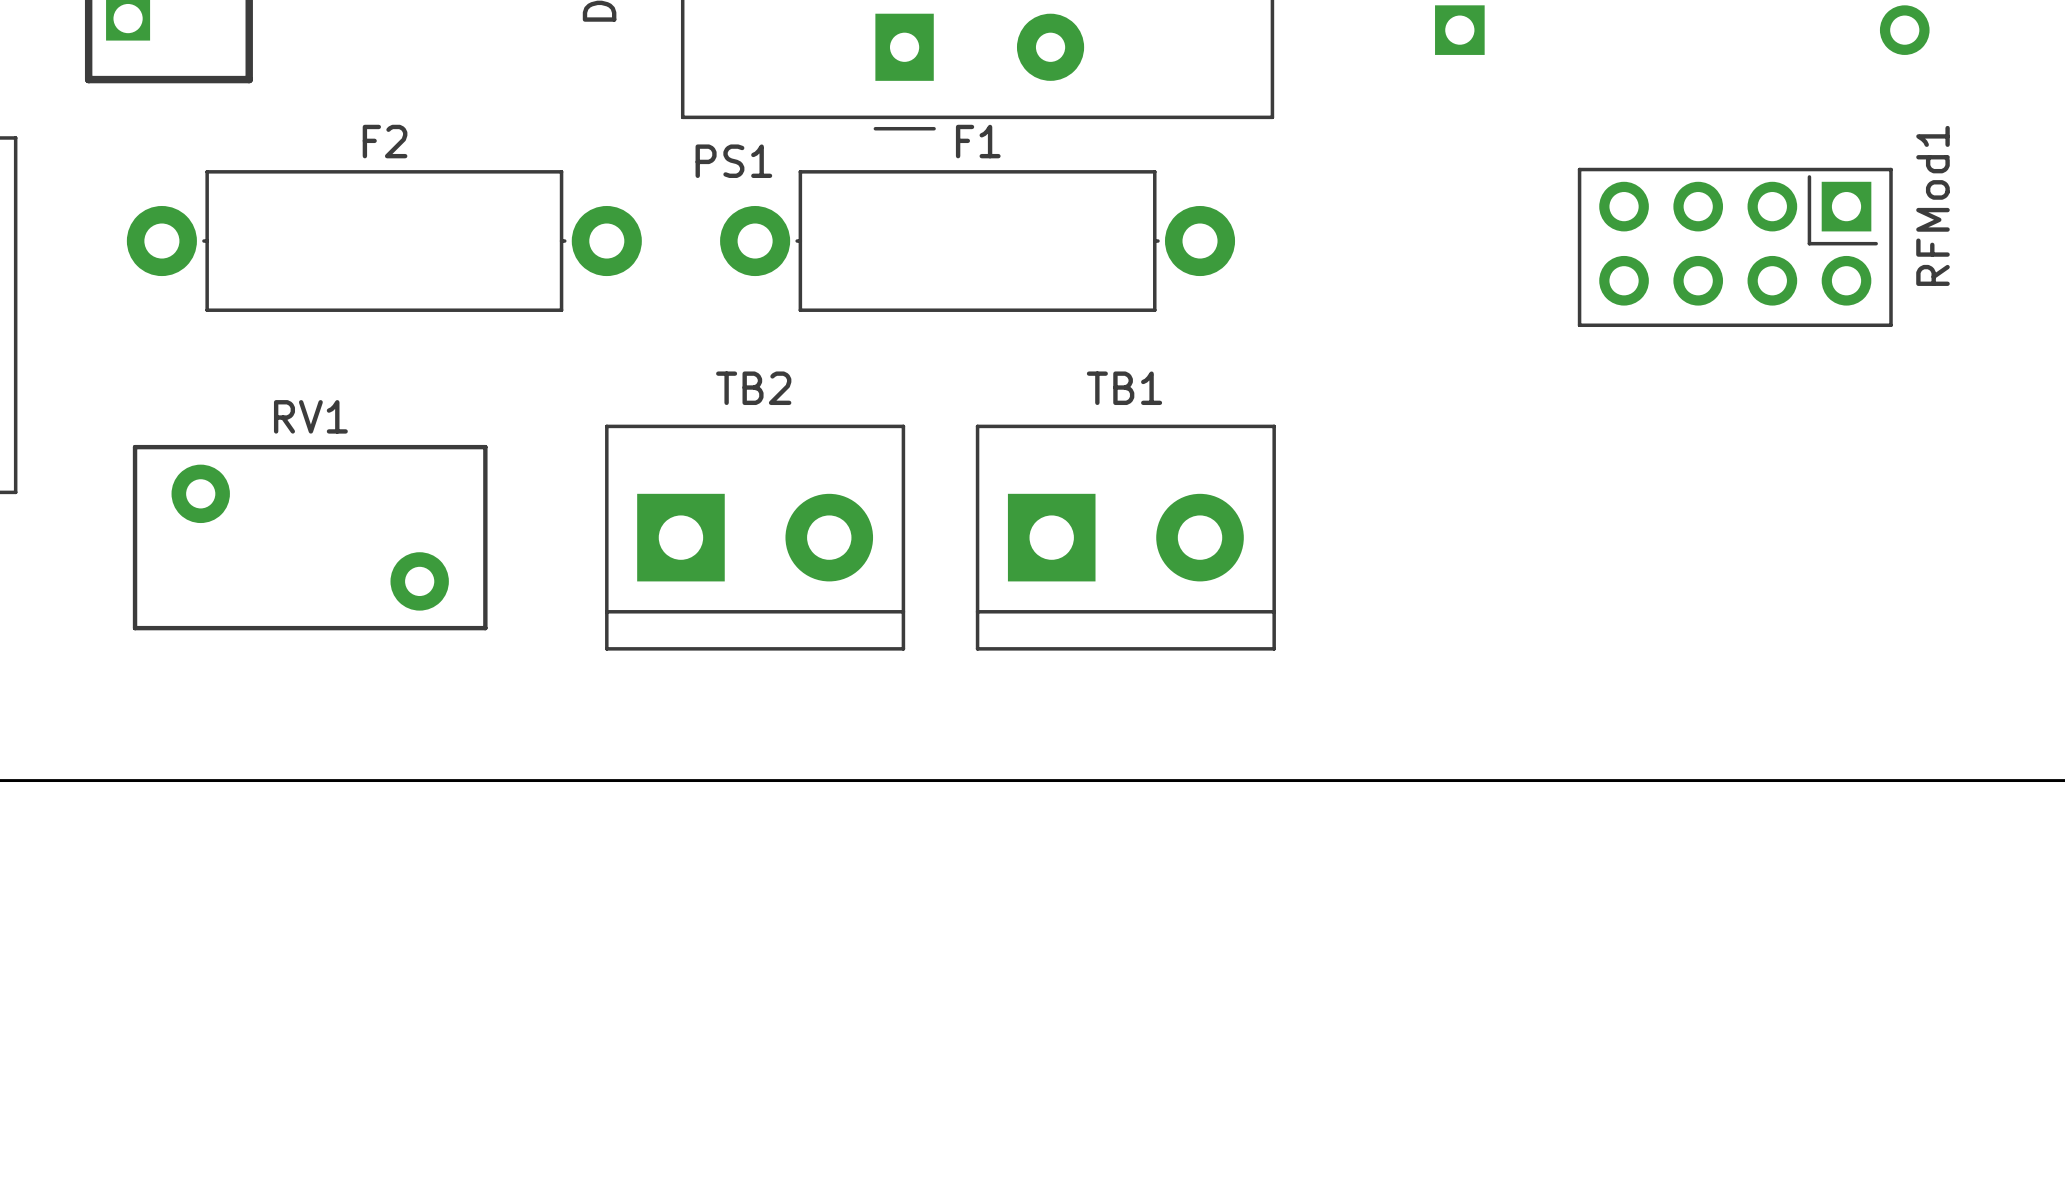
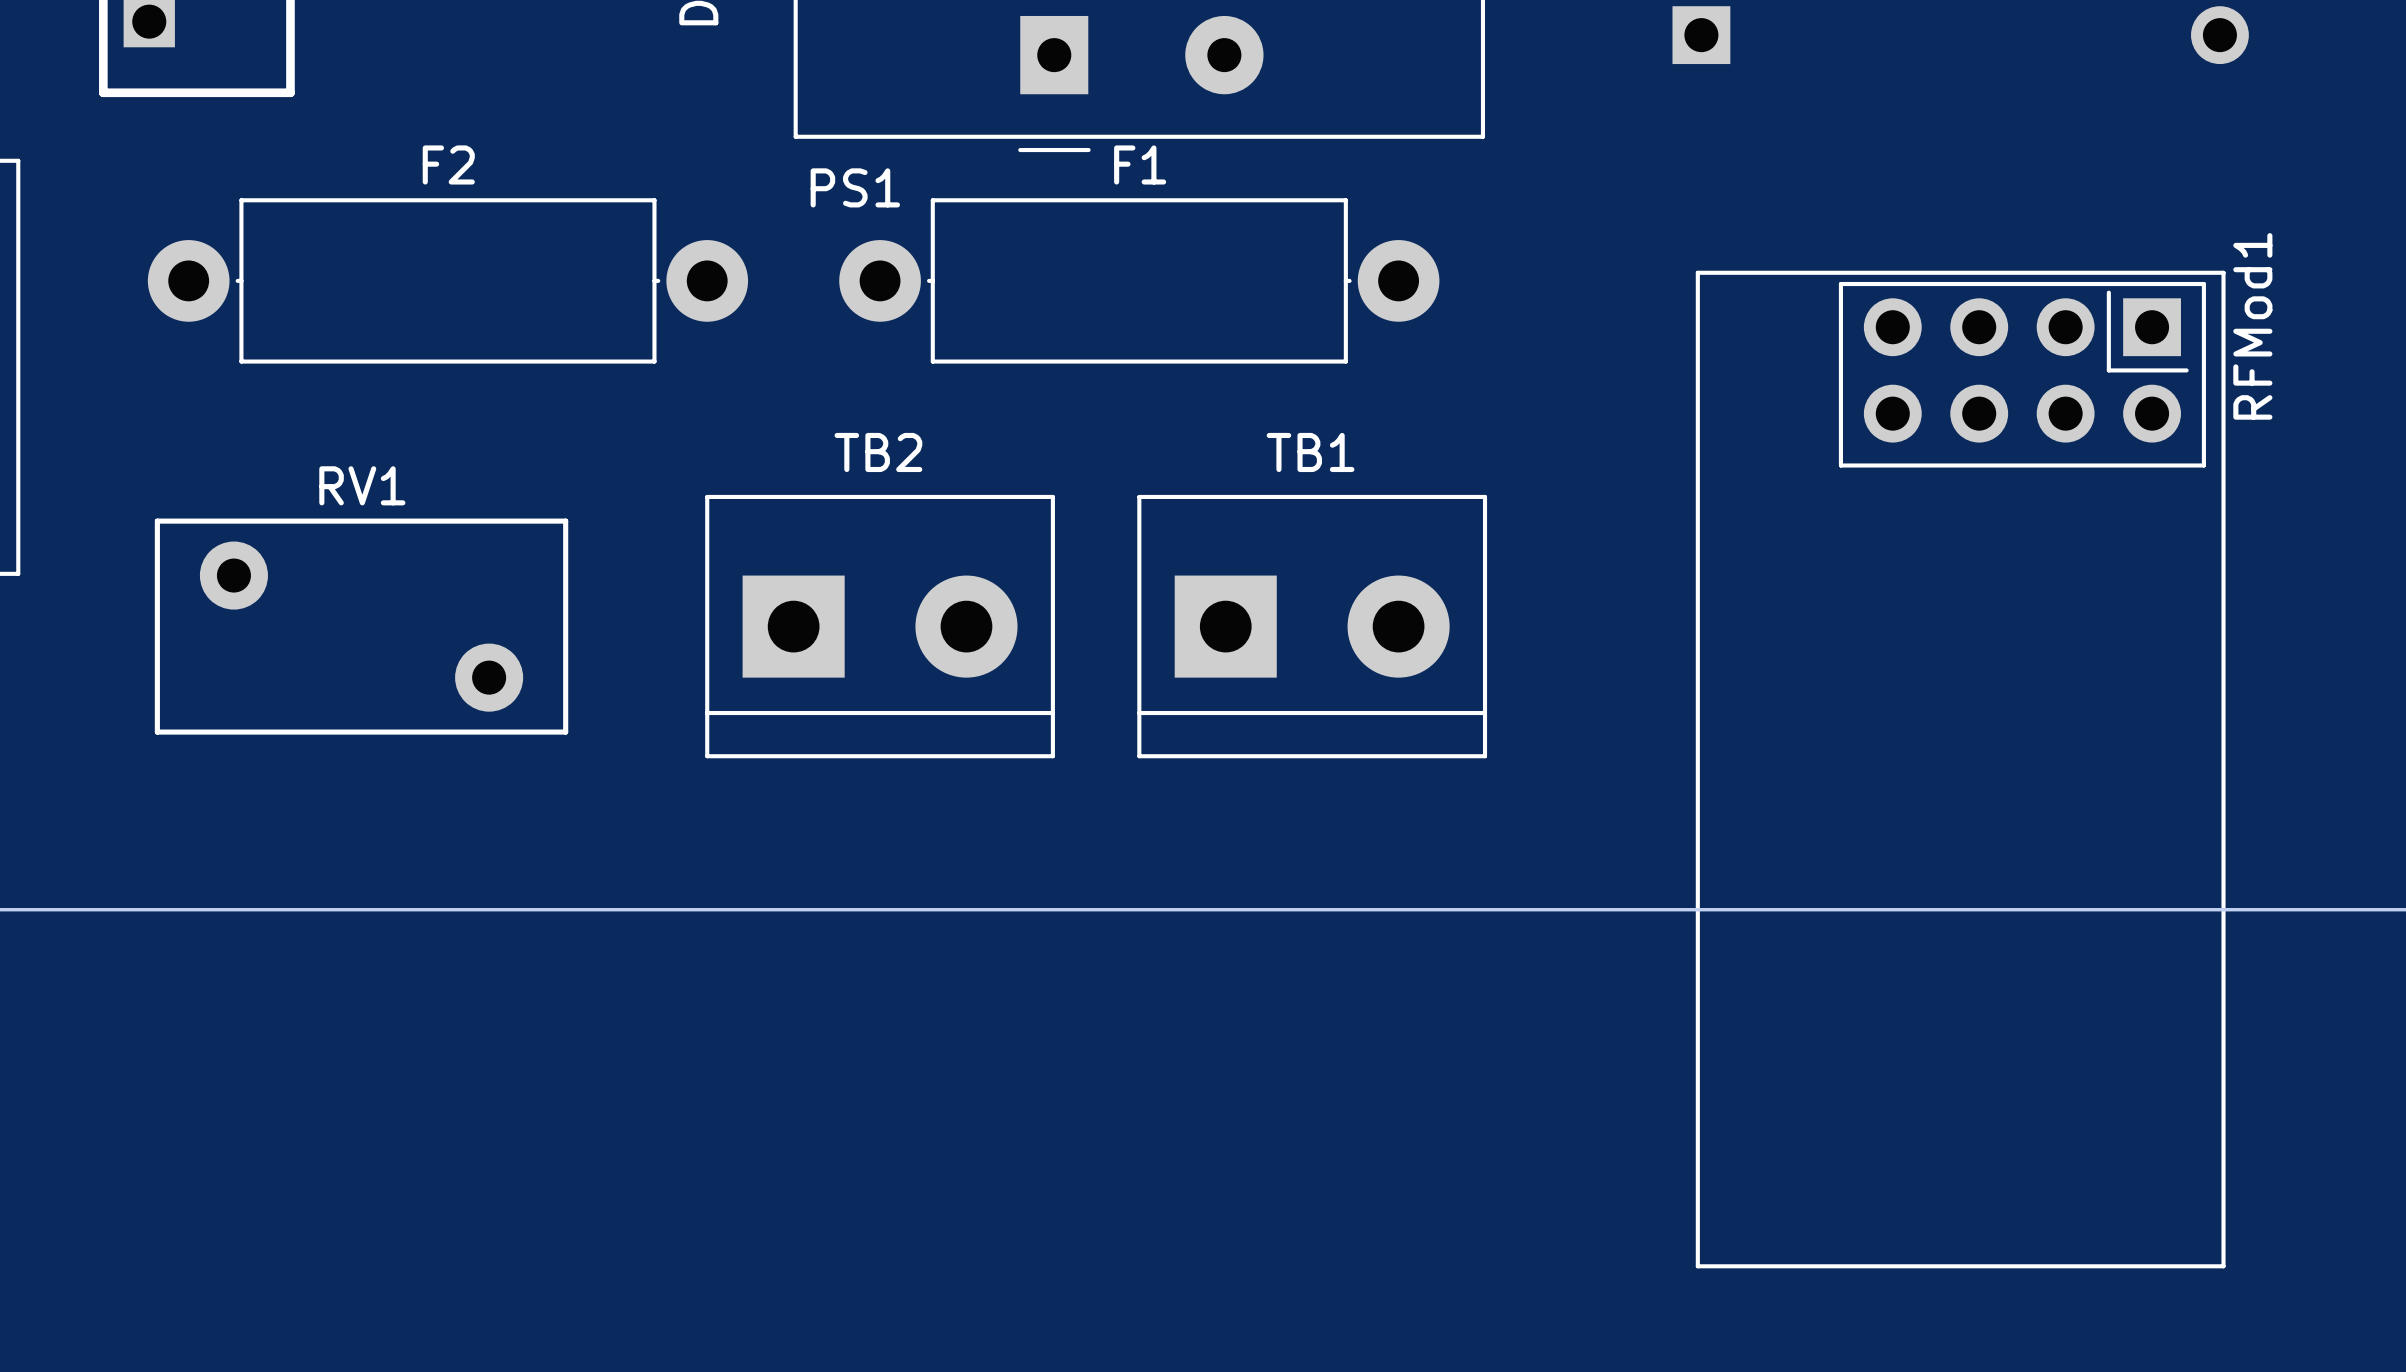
RFMod1 footprint: [1577, 158, 1910, 328] -> [1695, 270, 2226, 1269]
RFMod1 name position: RFMod1 (1933, 205) -> RFMod1 (2252, 326)

